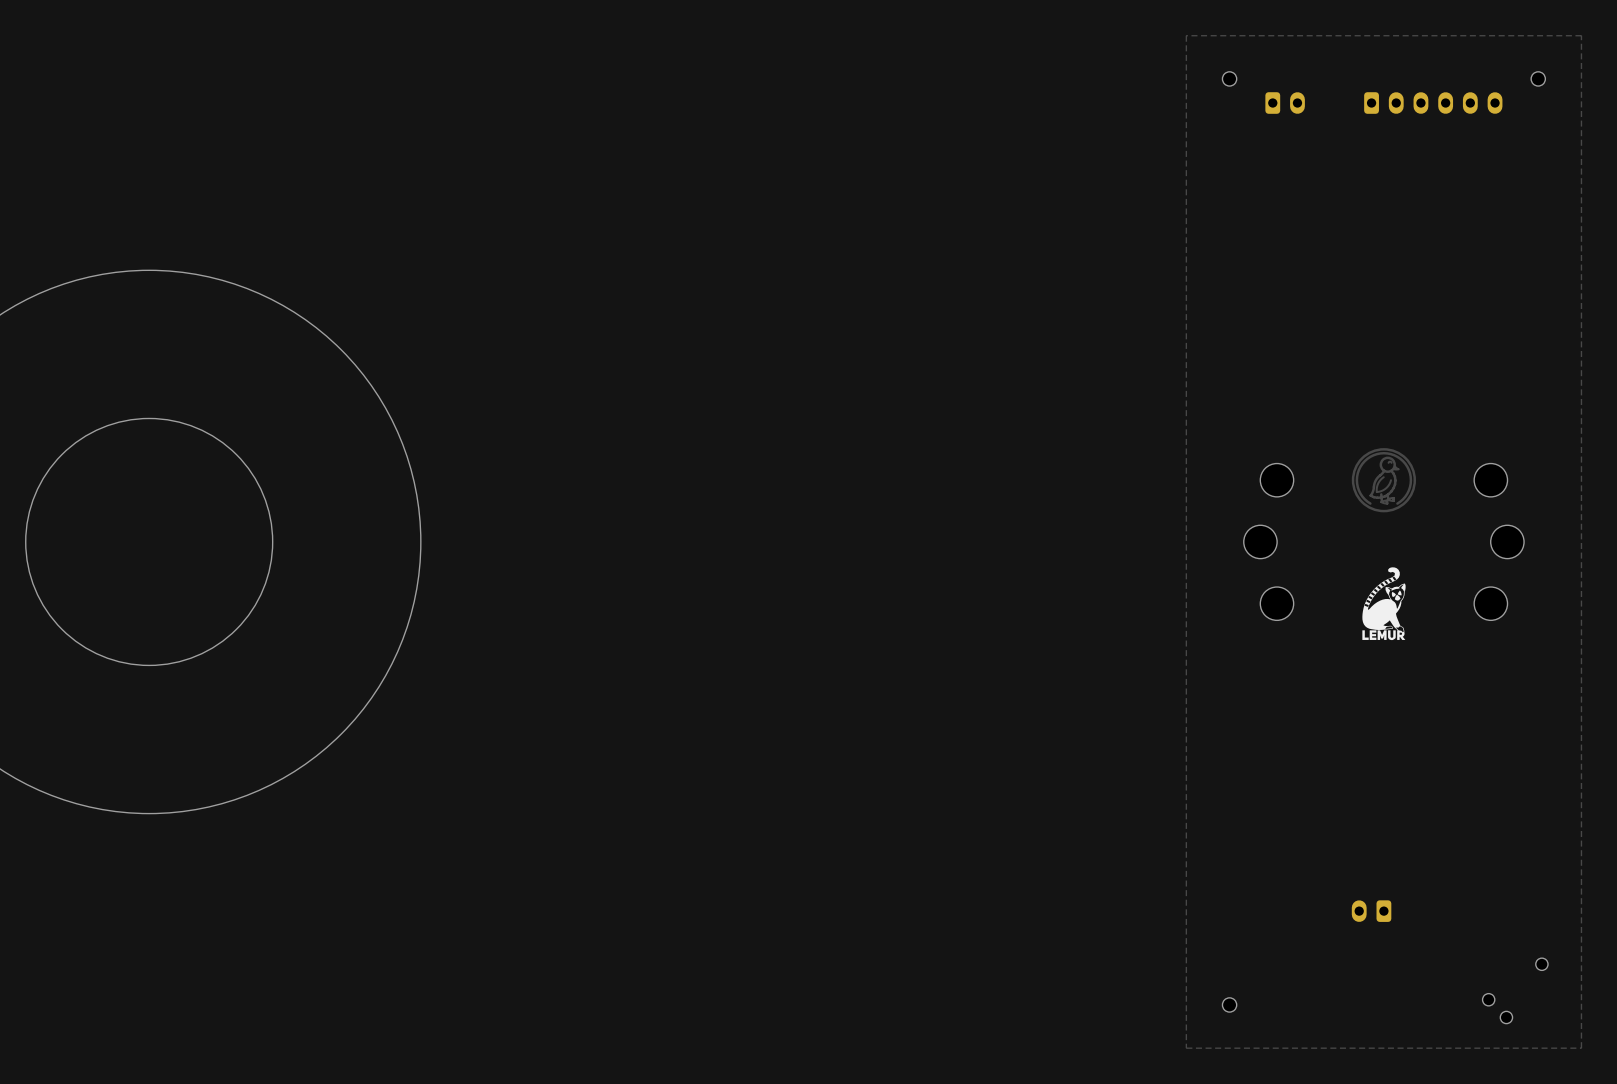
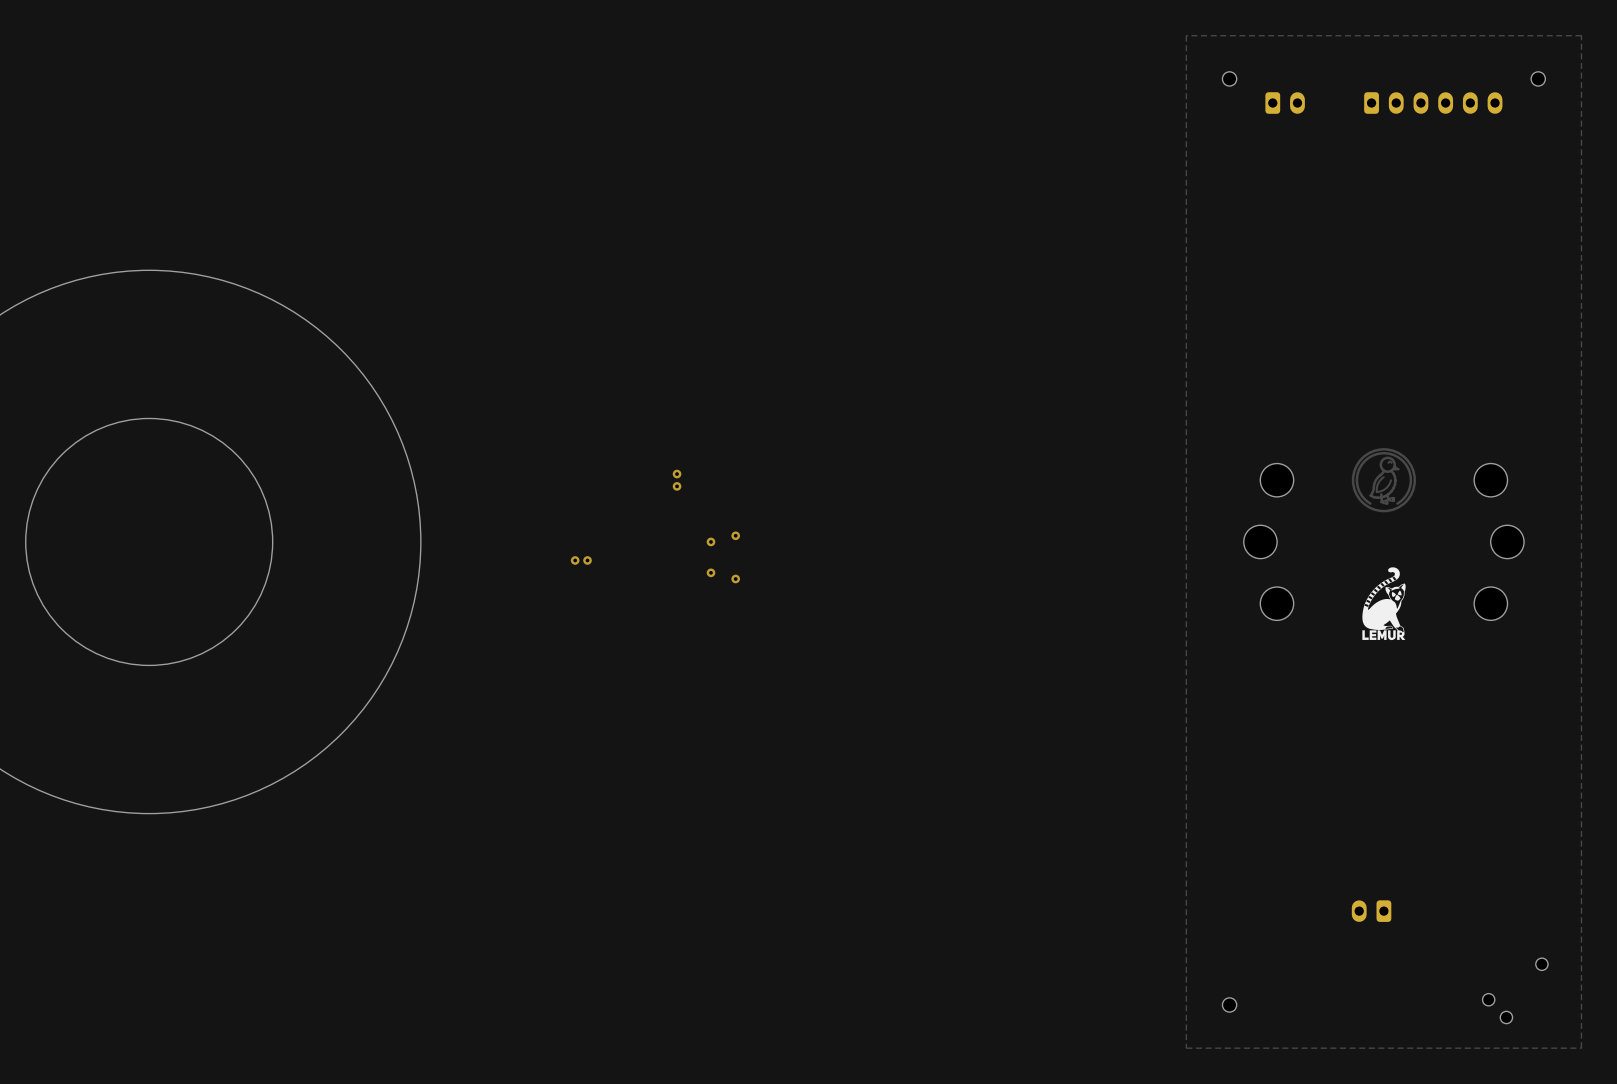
via: none -> (677, 474)
via: none -> (677, 486)
via: none -> (735, 535)
via: none -> (710, 541)
via: none -> (575, 560)
via: none -> (587, 560)
via: none -> (710, 572)
via: none -> (735, 578)

